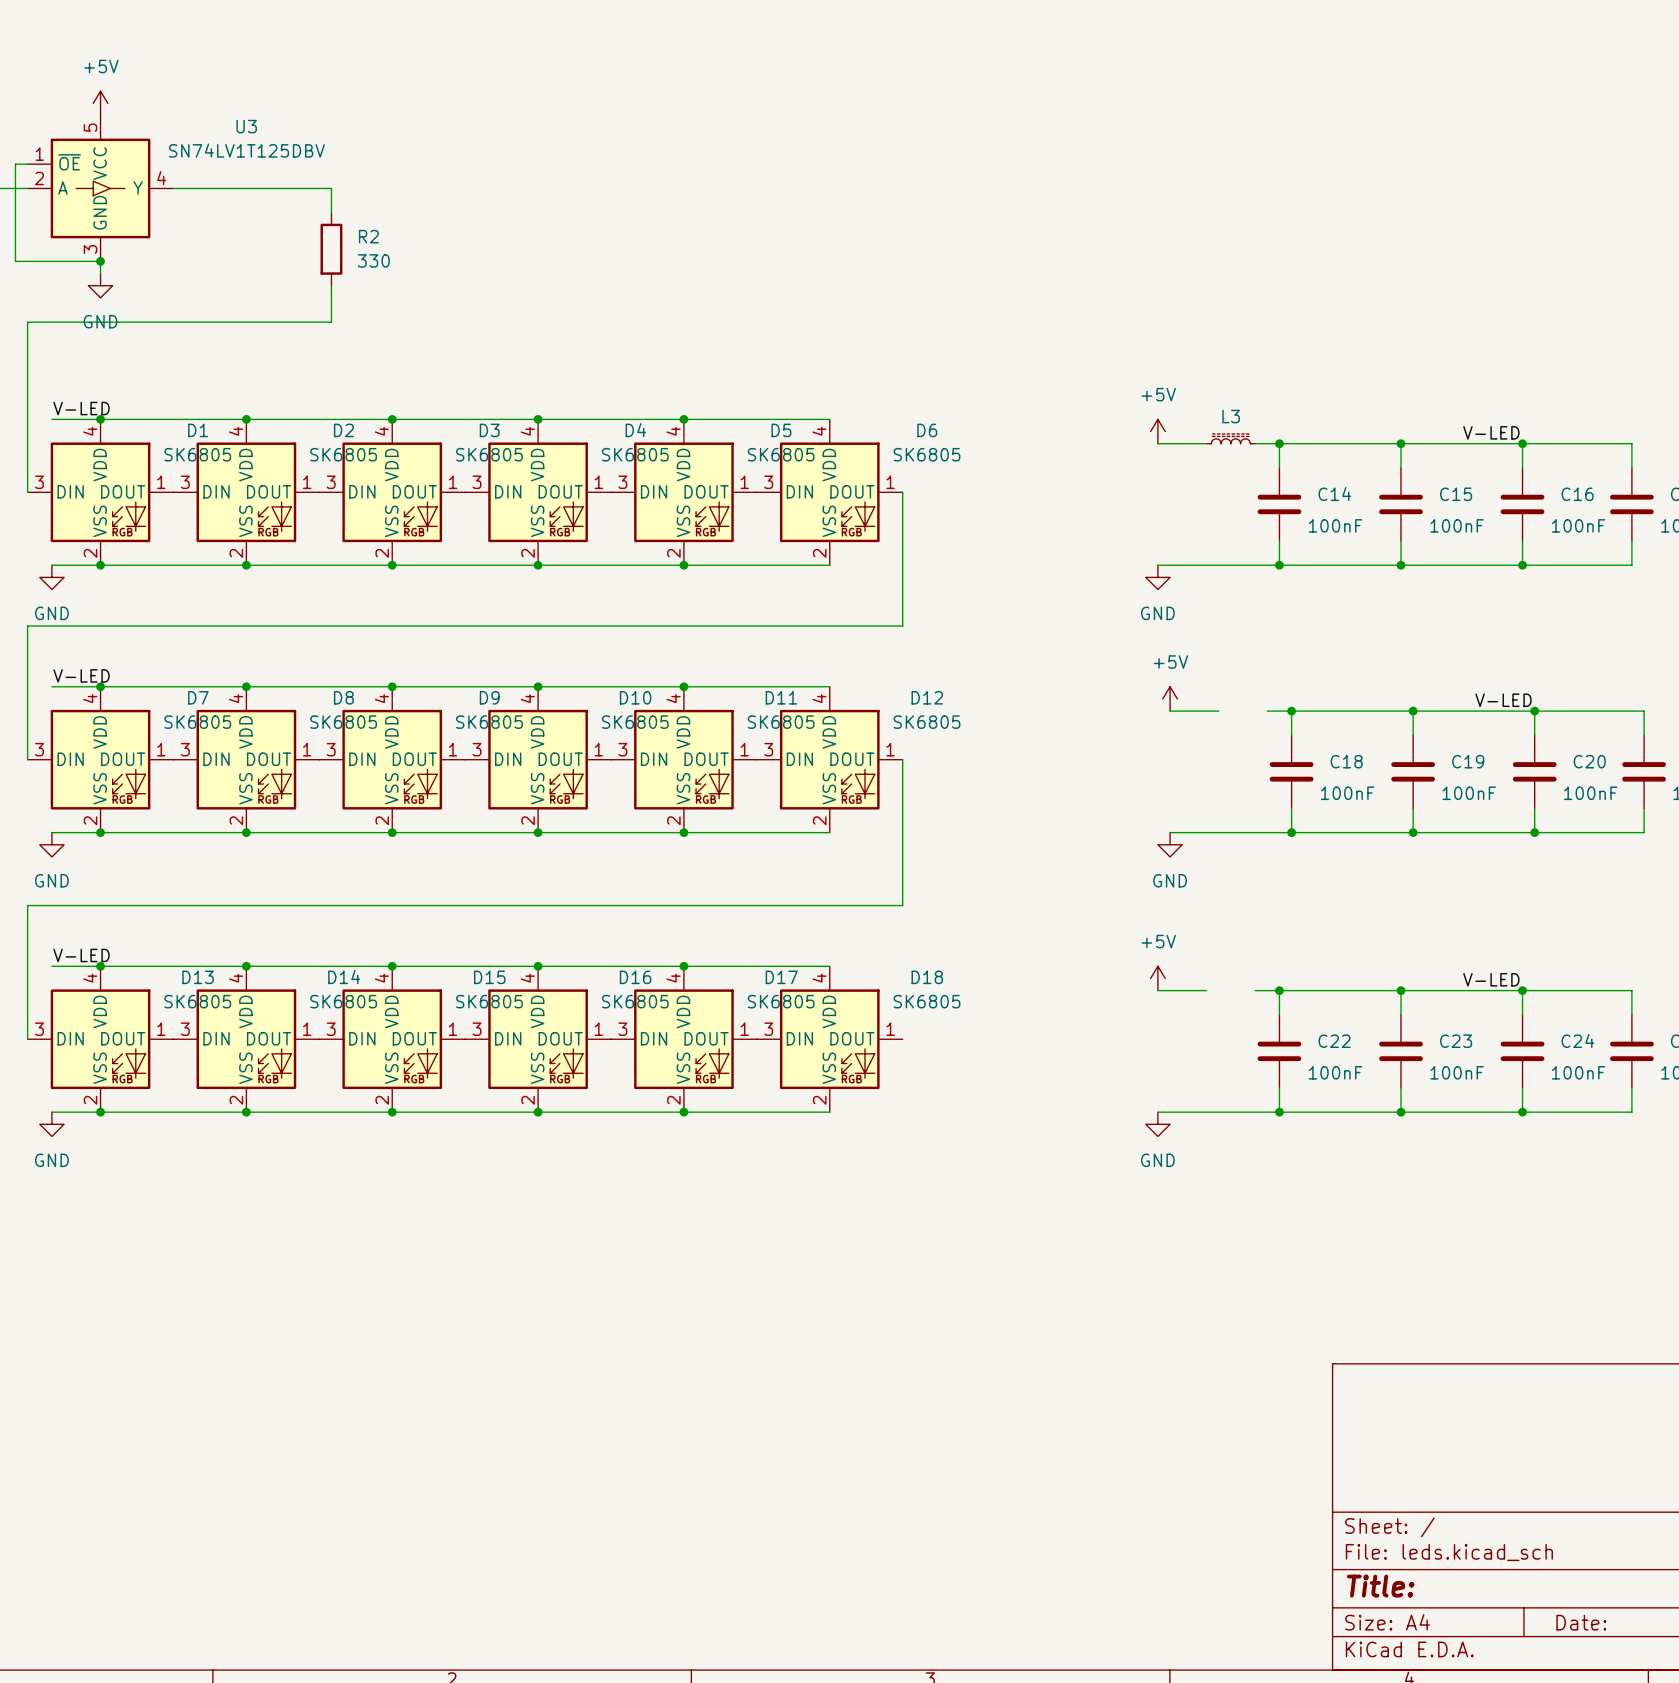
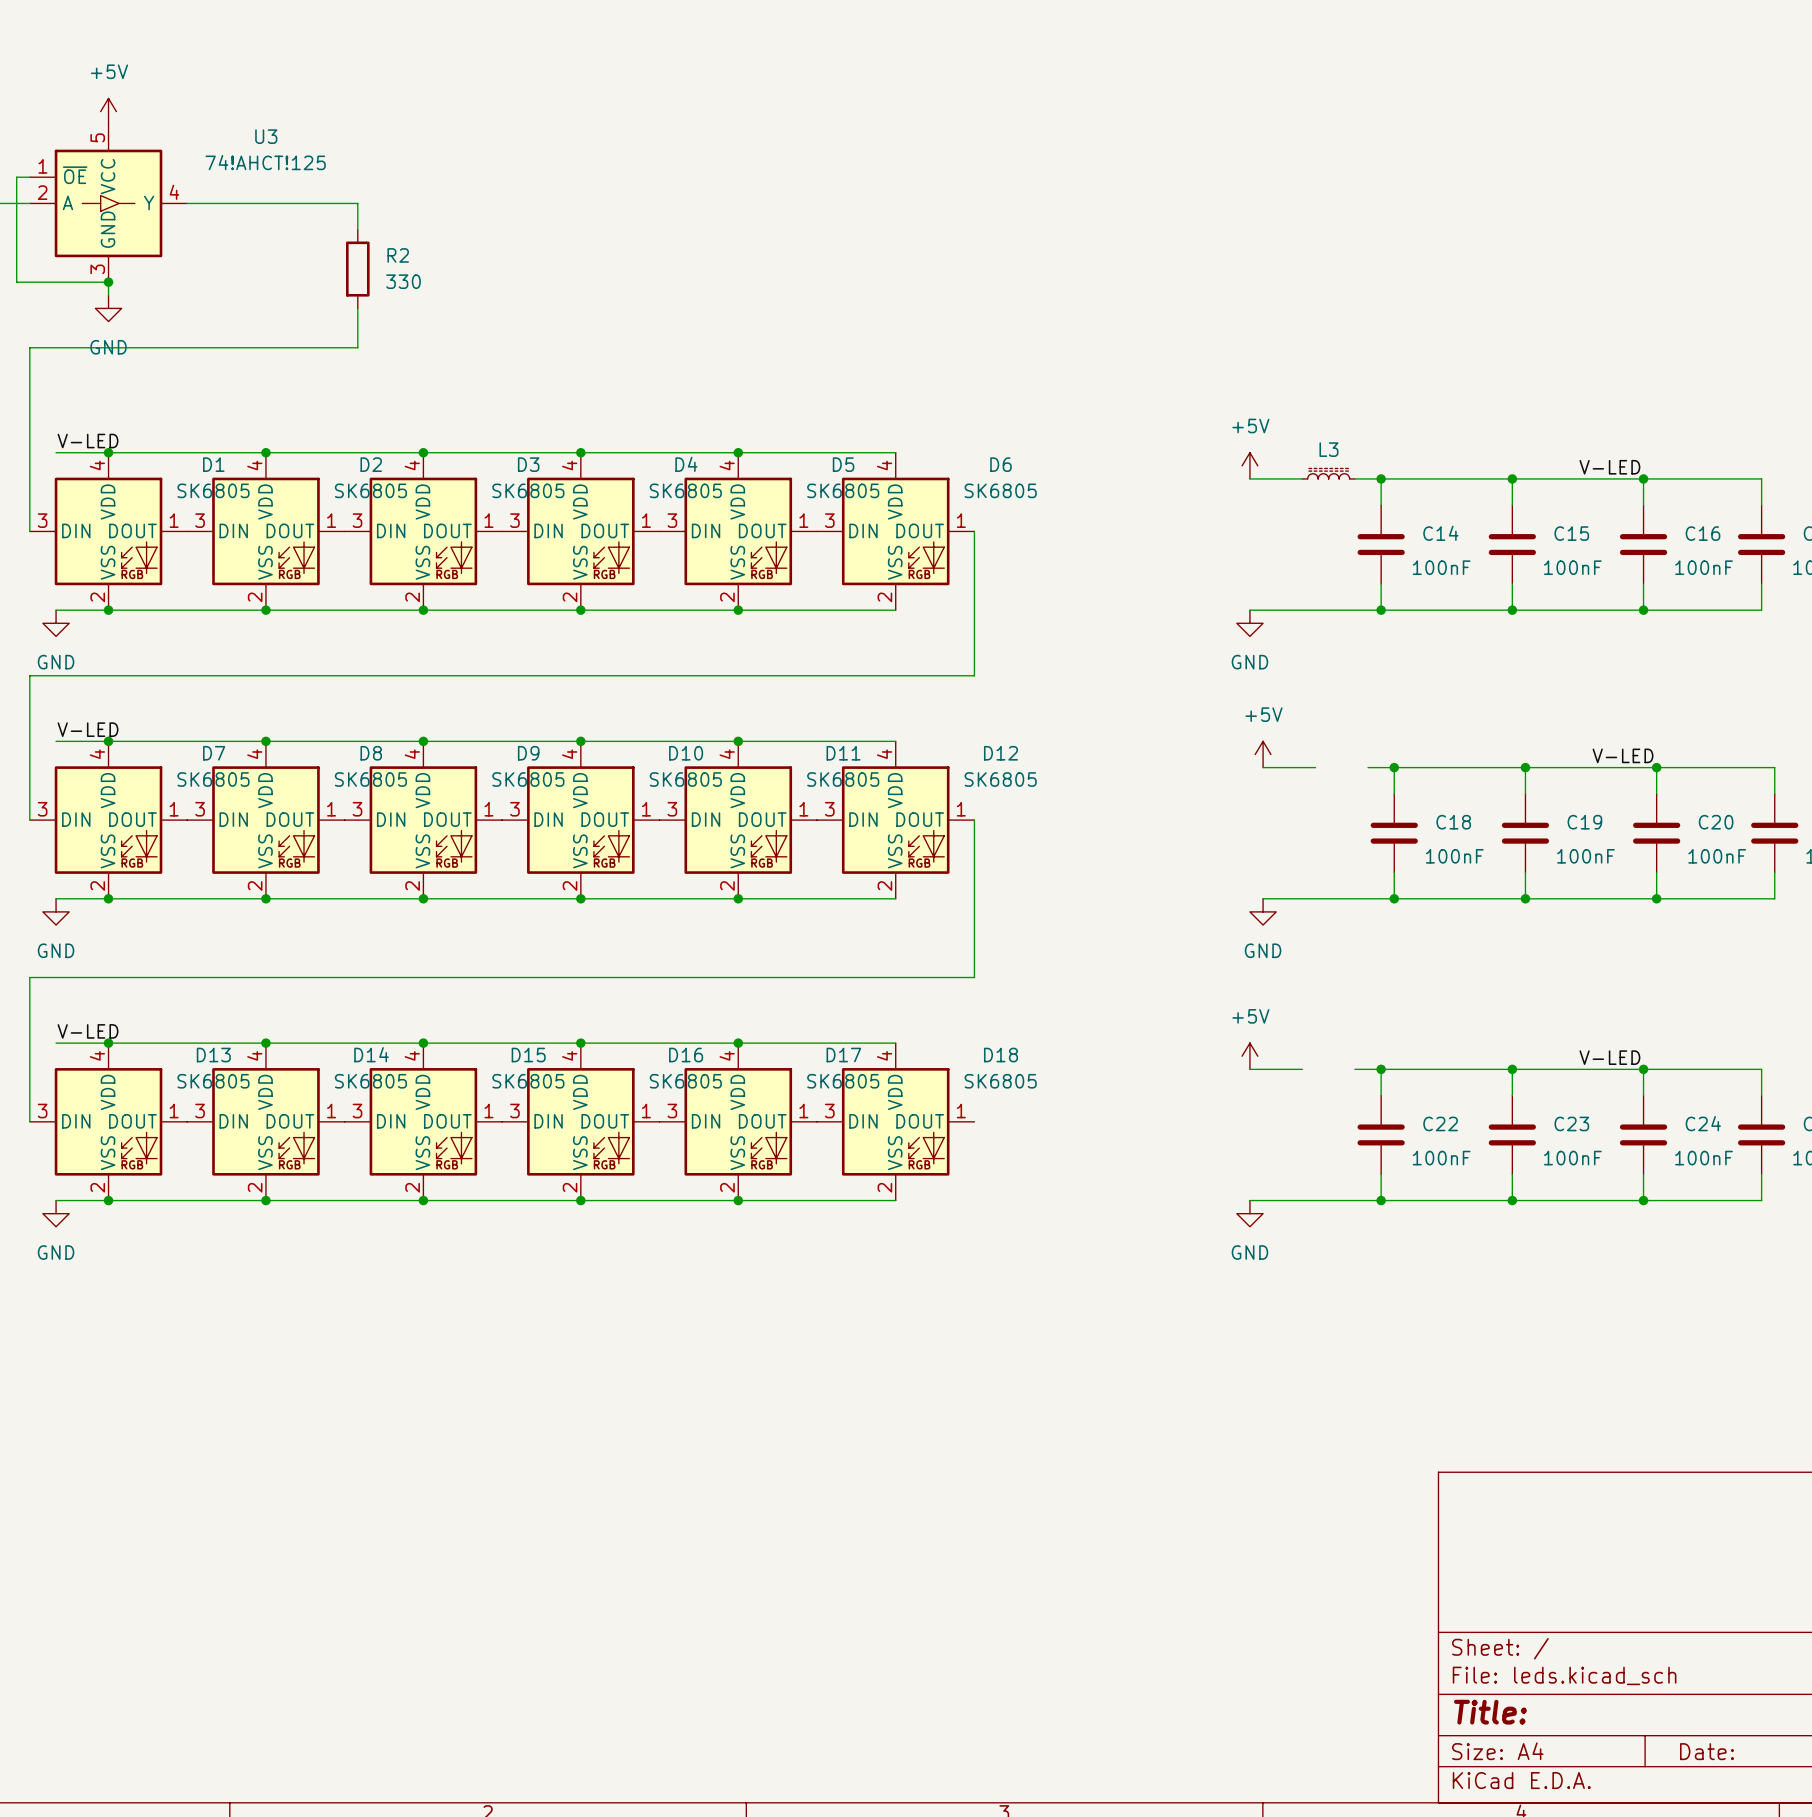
U3 value: SN74LV1T125DBV (246, 150) -> 74!AHCT!125 (265, 162)

